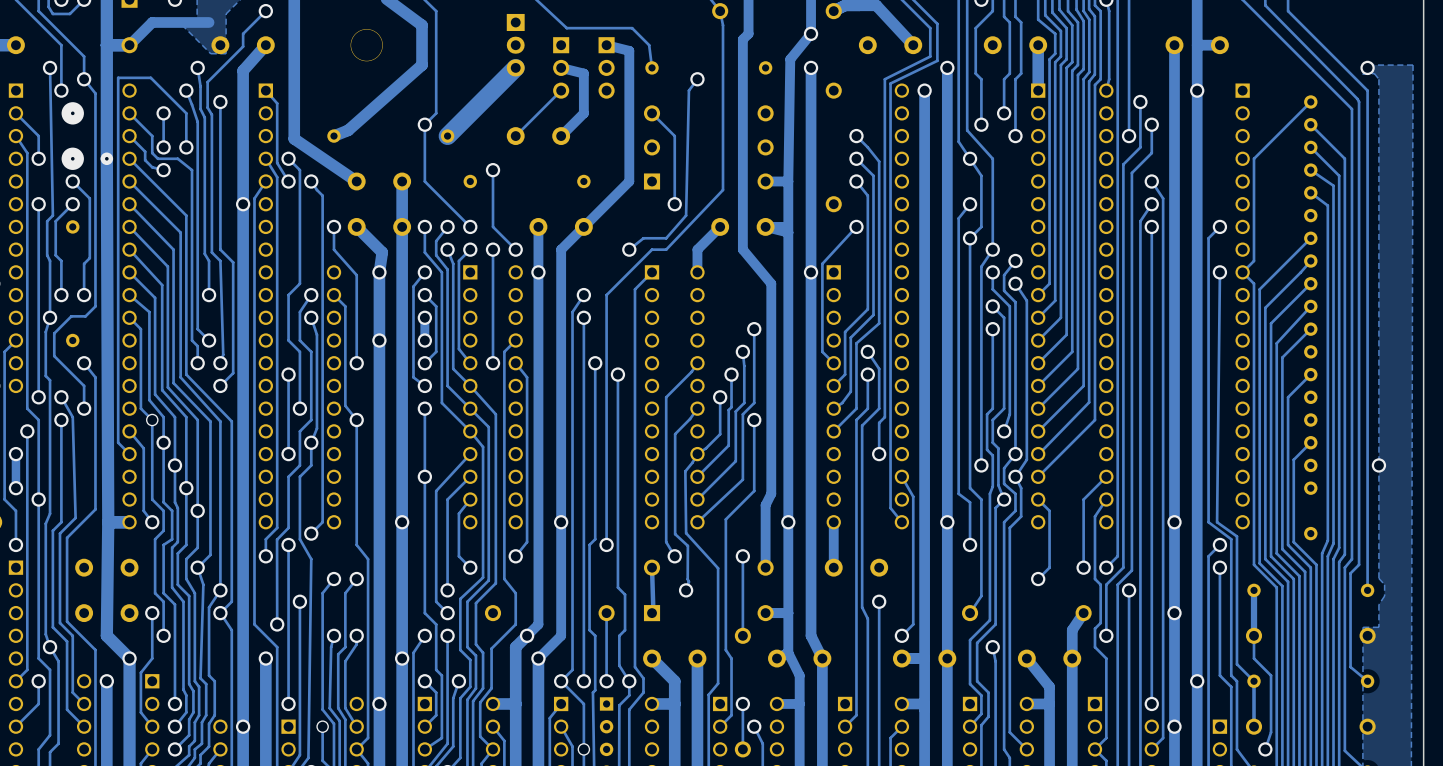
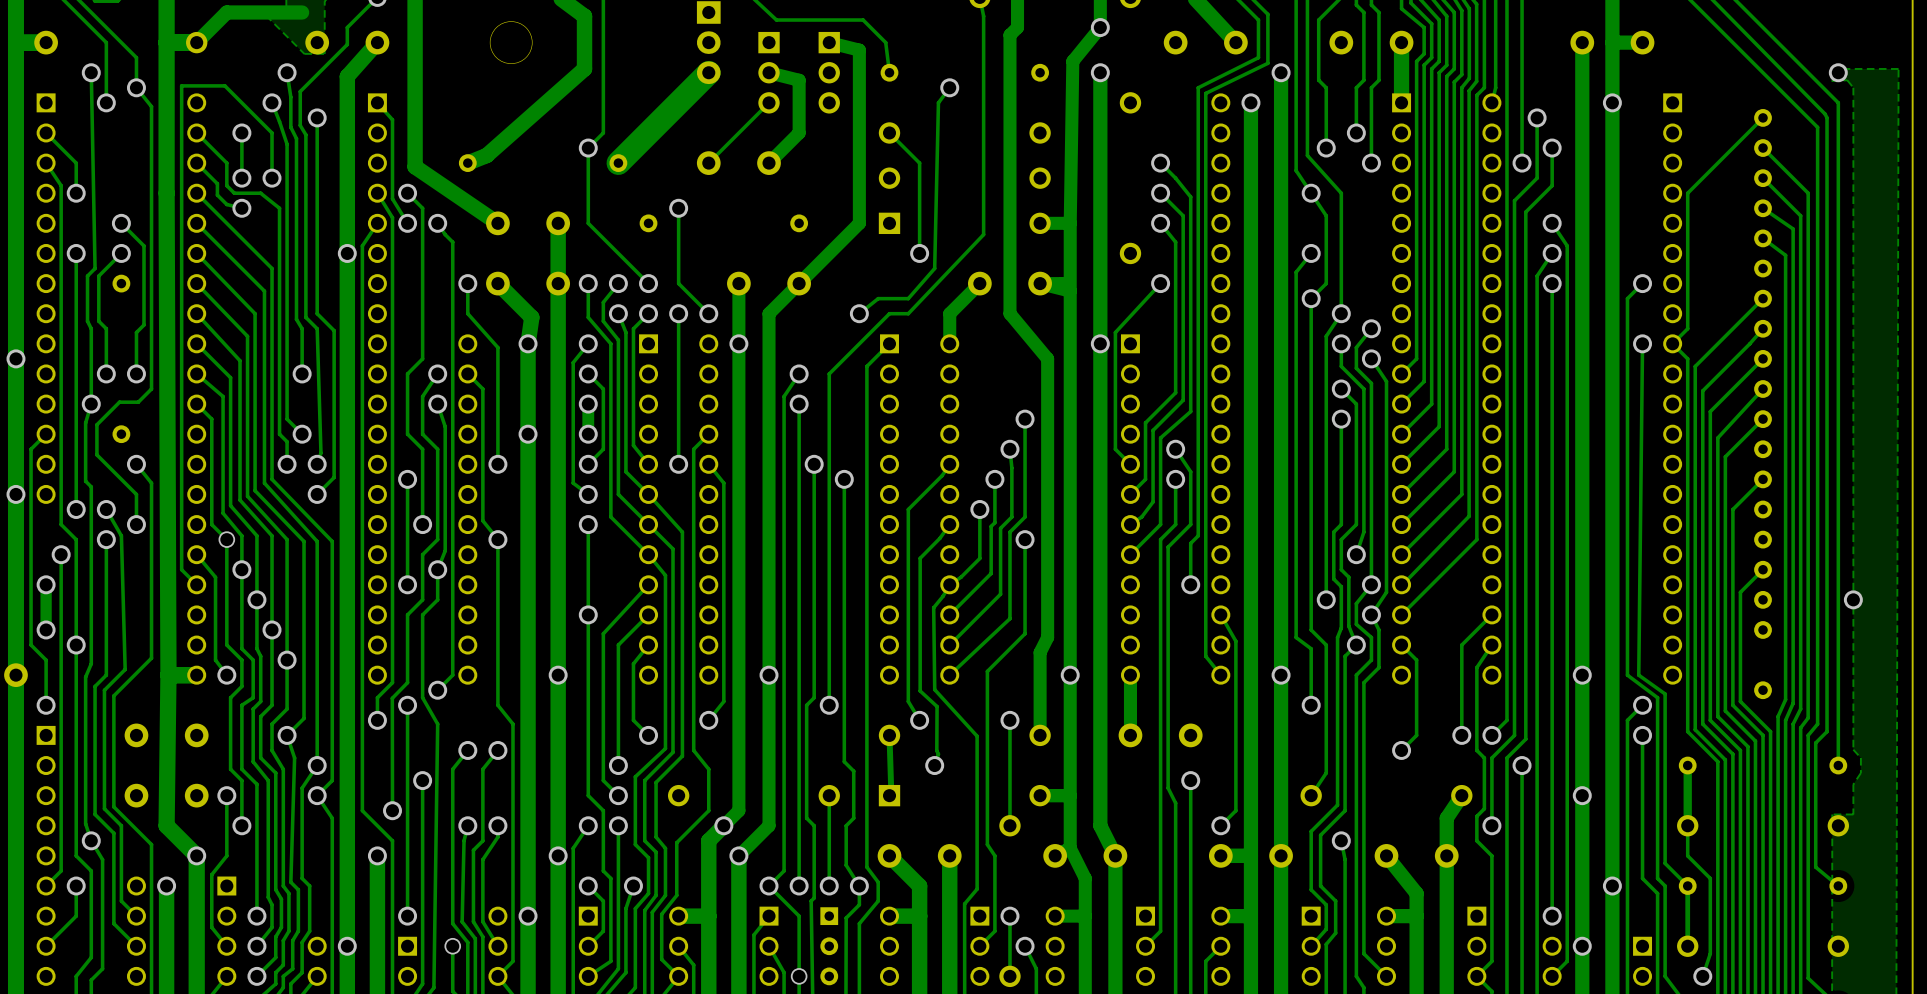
via: (72, 113) -> none
via: (72, 158) -> none
via: (106, 158) -> none

